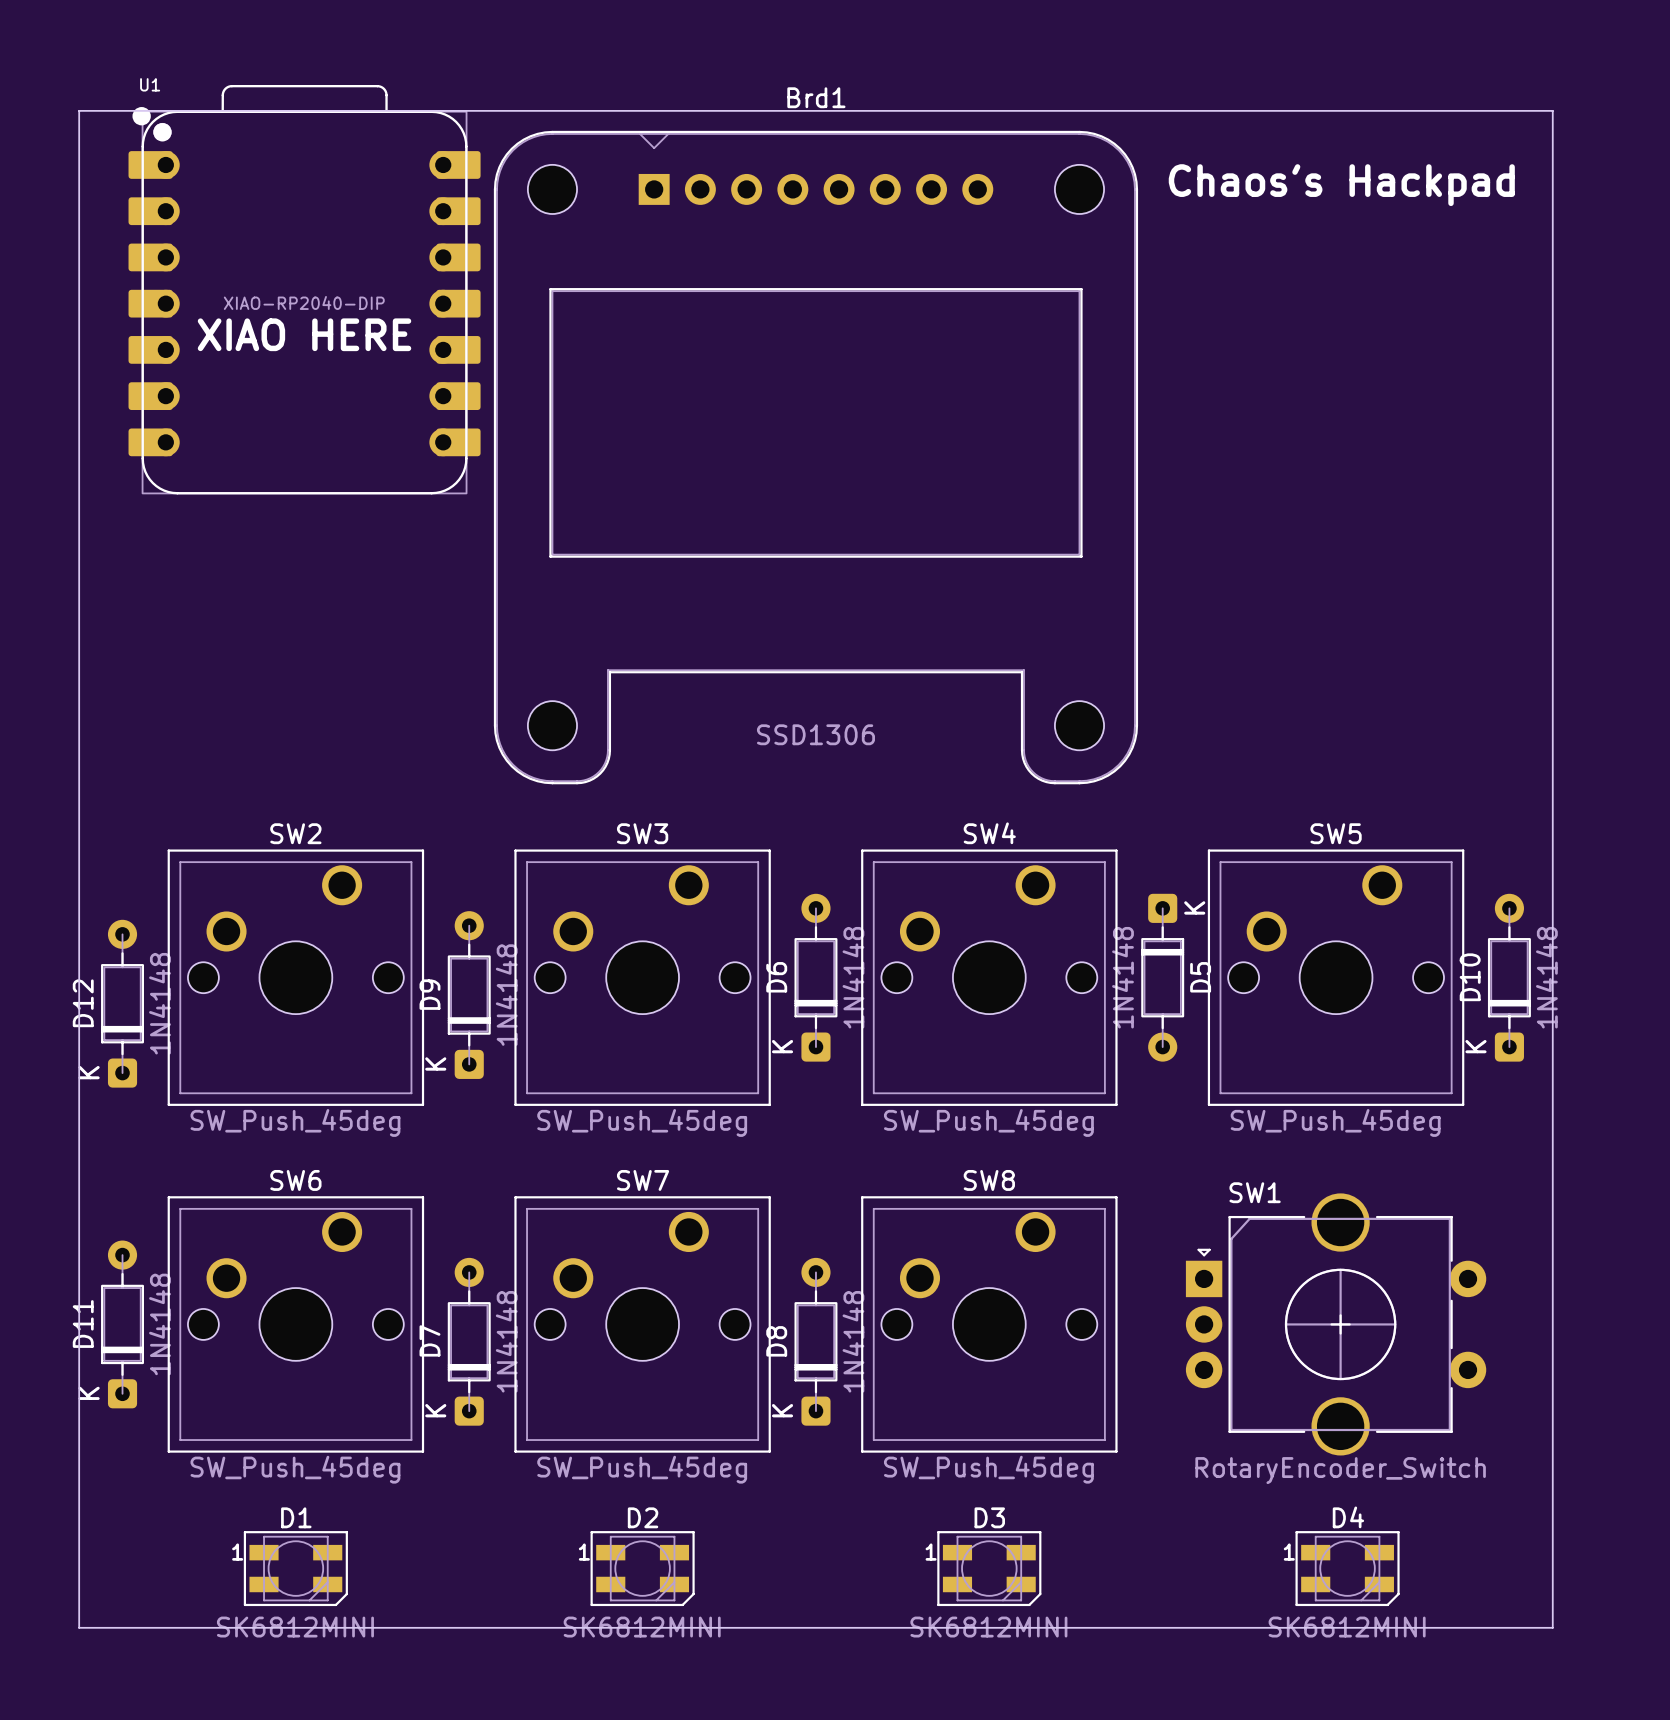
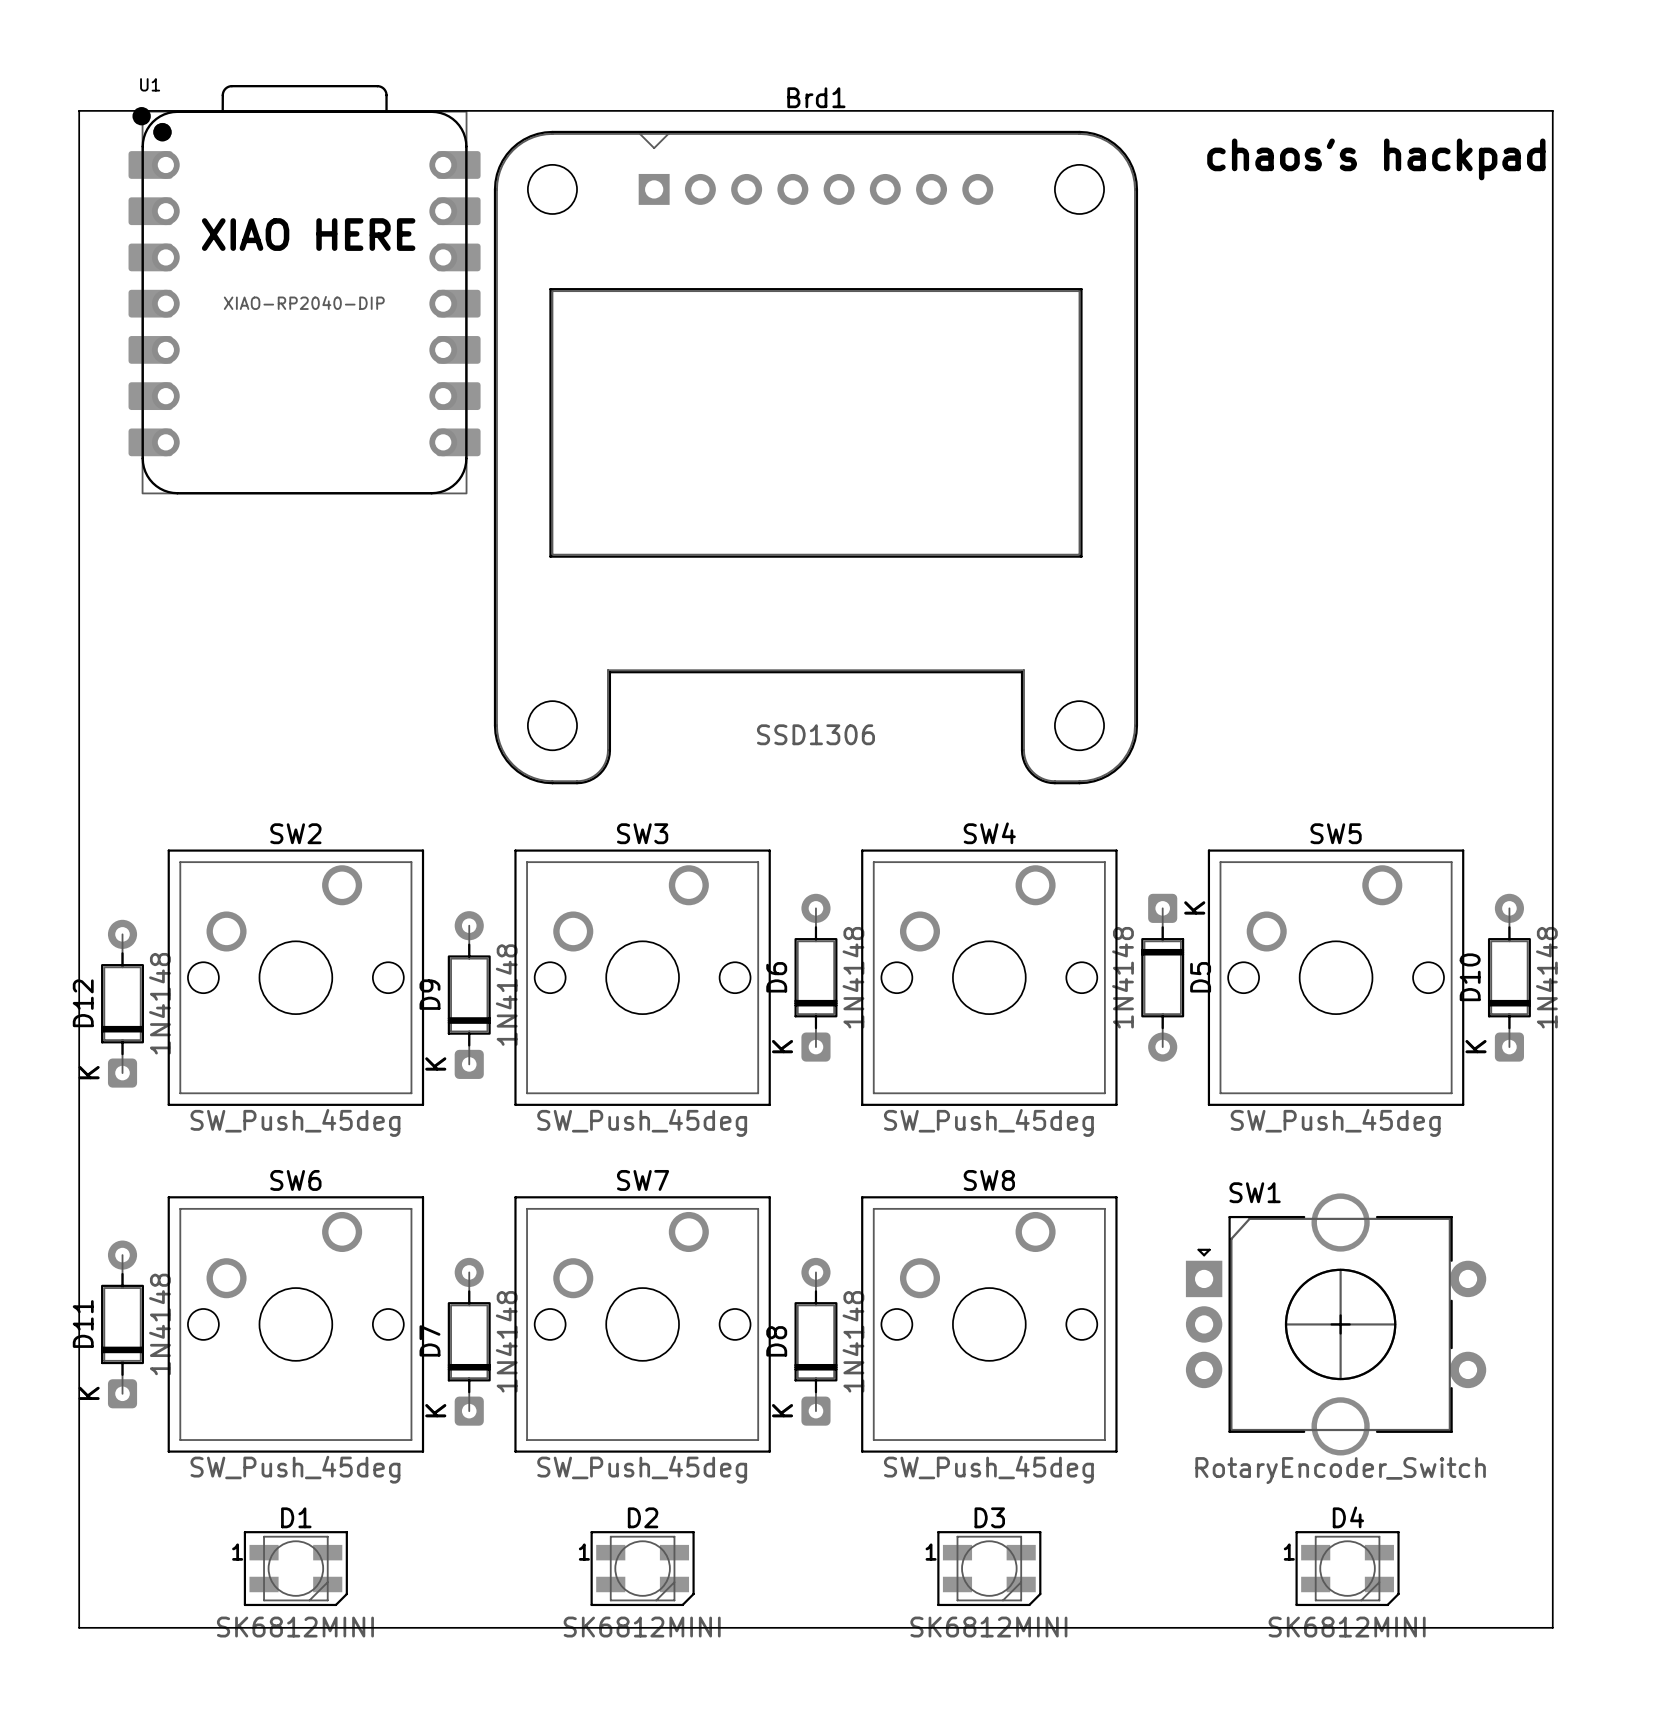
text: Chaos's Hackpad (1341, 185) -> chaos's hackpad (1376, 159)
text position: XIAO HERE (304, 334) -> XIAO HERE (308, 234)

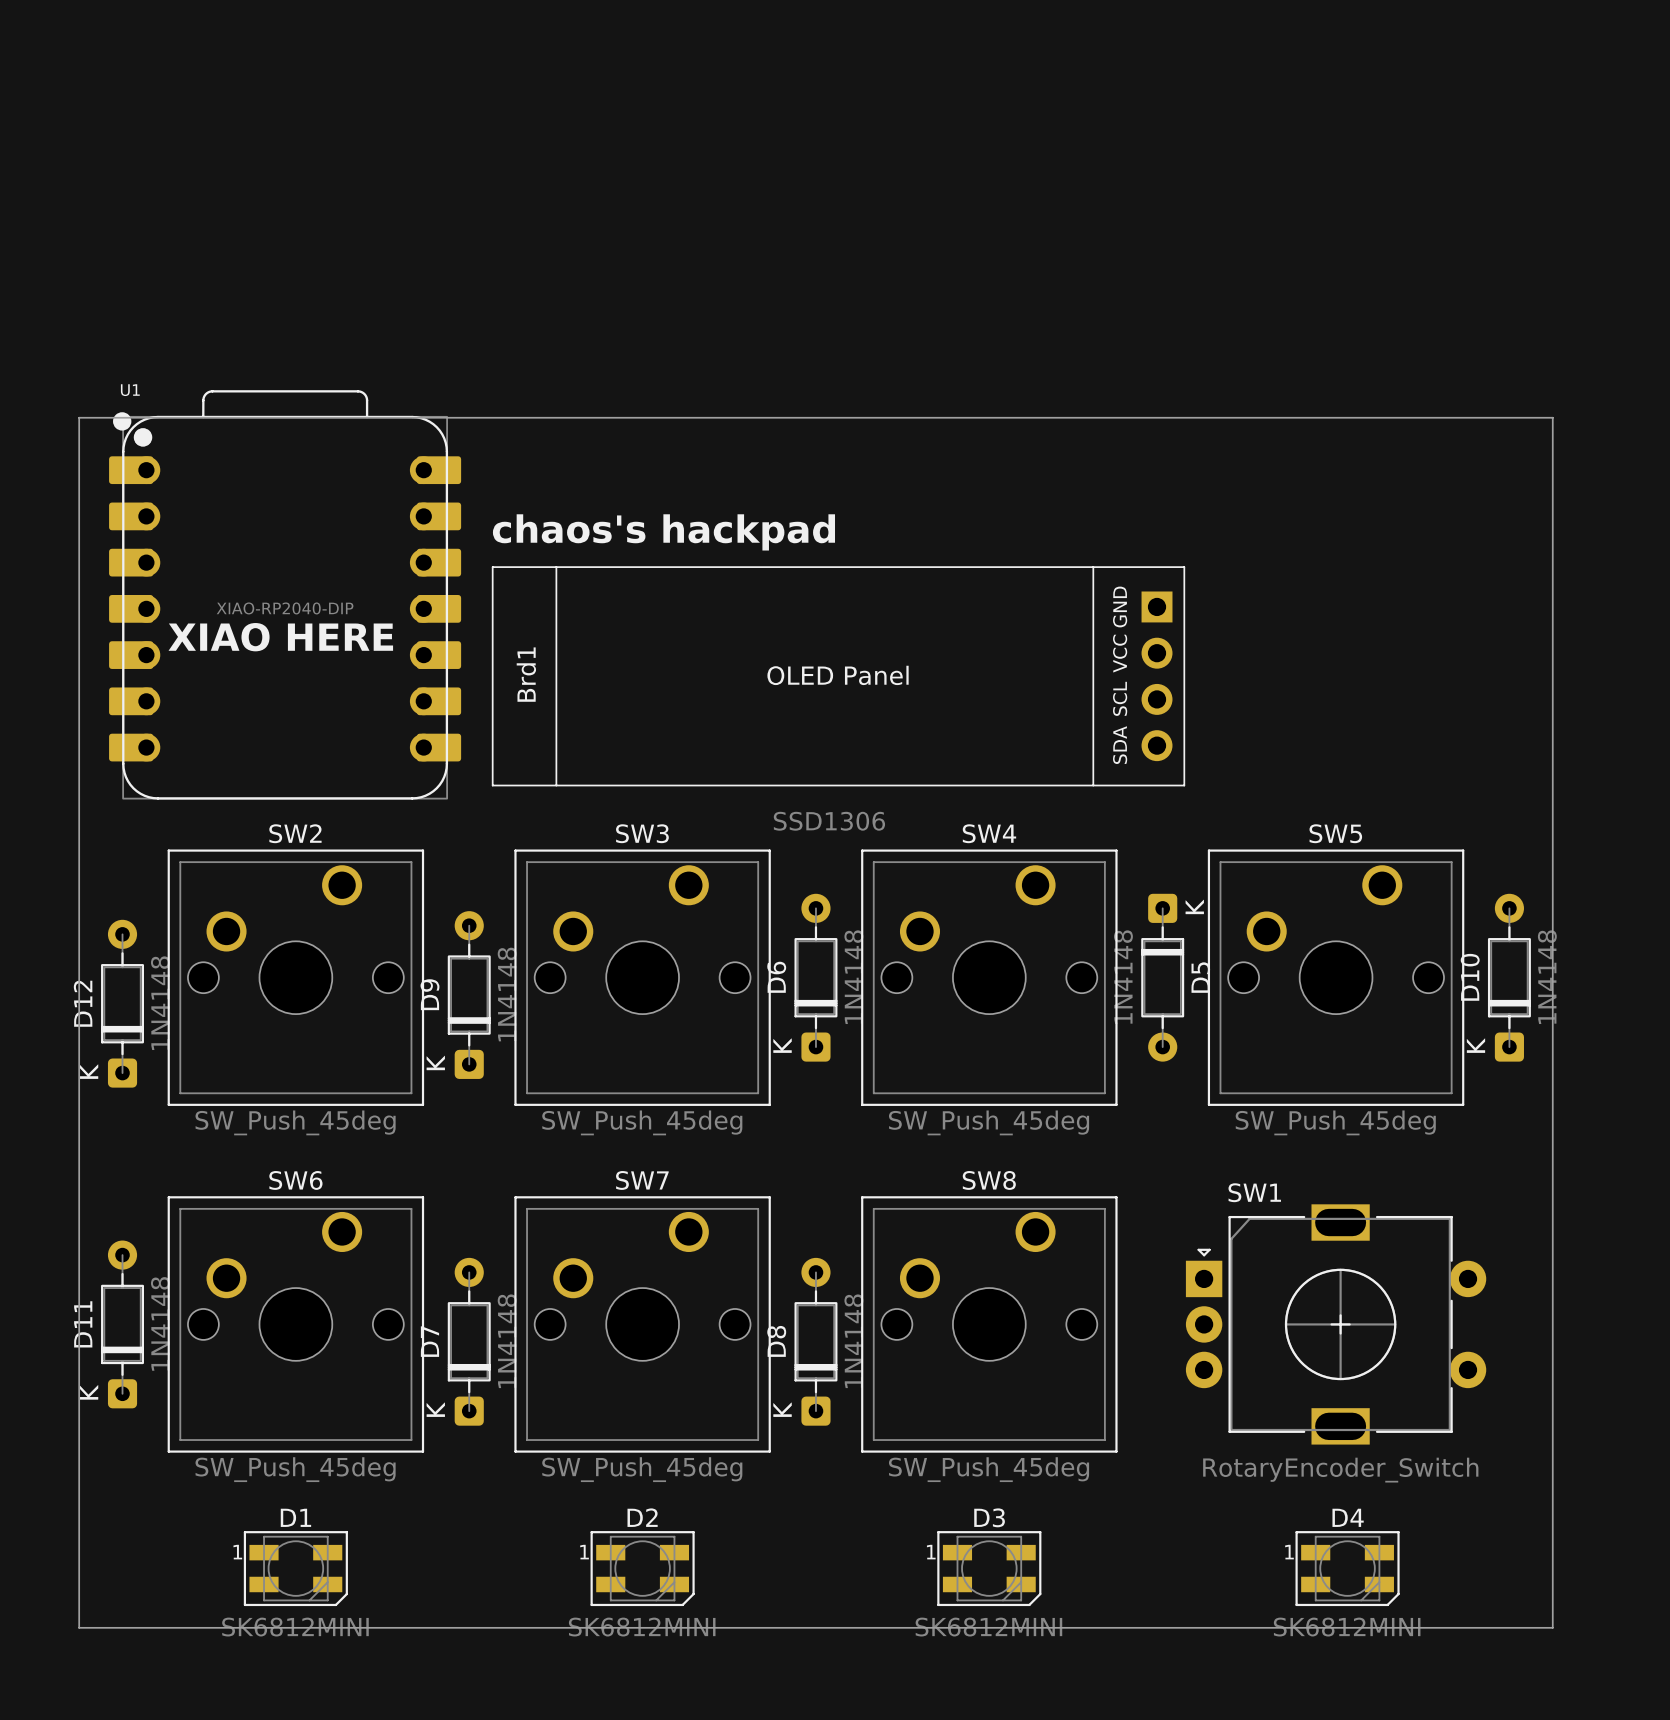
Brd1 name position: Brd1 (816, 97) -> Brd1 (526, 674)
Brd1 footprint: [493, 130, 1139, 785] -> [492, 566, 1185, 786]
text: chaos's hackpad (1376, 159) -> none
text position: XIAO HERE (308, 234) -> XIAO HERE (280, 637)
U1 position: (304, 289) -> (285, 594)
board edge: (79, 417) (79, 110) (1552, 110) (1552, 417) -> (79, 417) (1552, 417)
text: none -> chaos's hackpad (663, 532)
Brd1 value position: SSD1306 (815, 734) -> SSD1306 (829, 821)
SW1 footprint: [1185, 1193, 1487, 1456] -> [1185, 1204, 1487, 1445]

